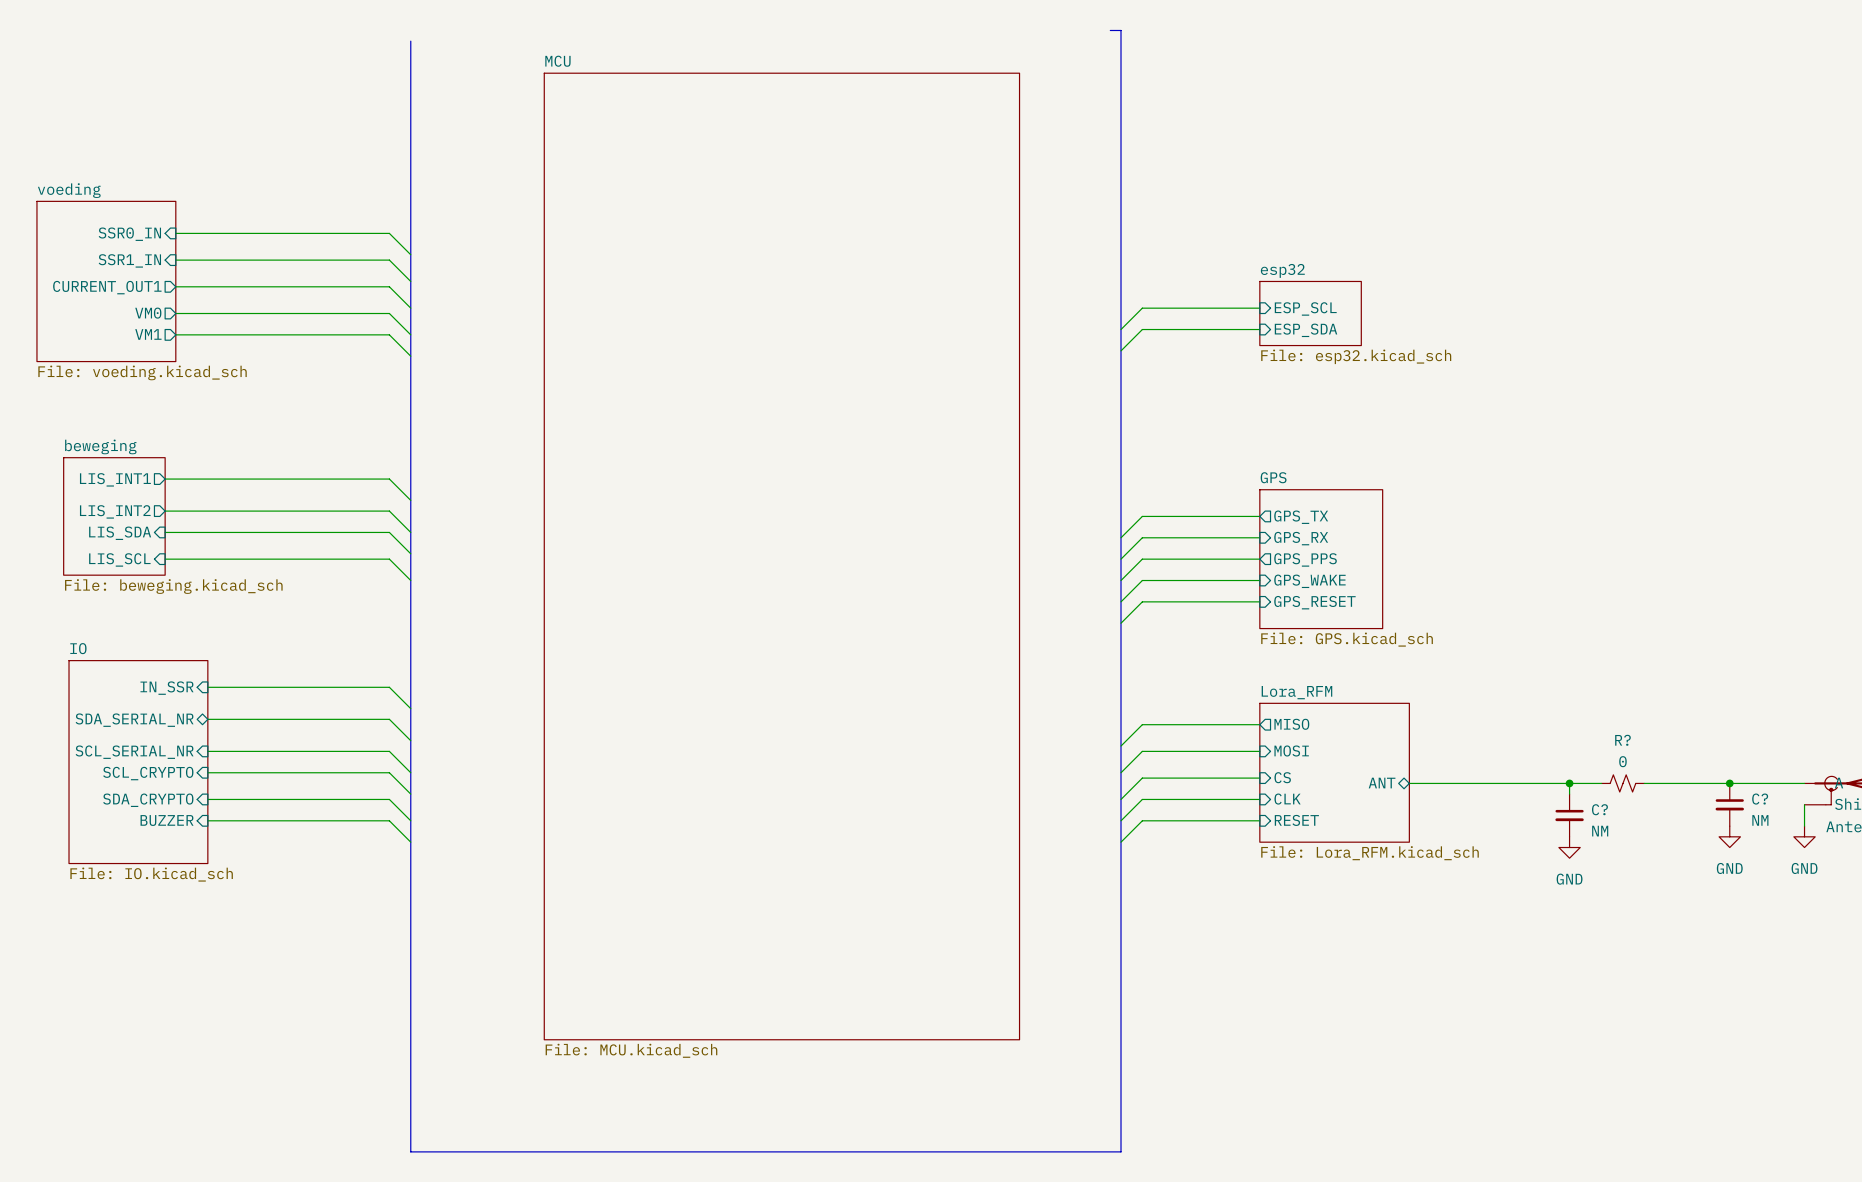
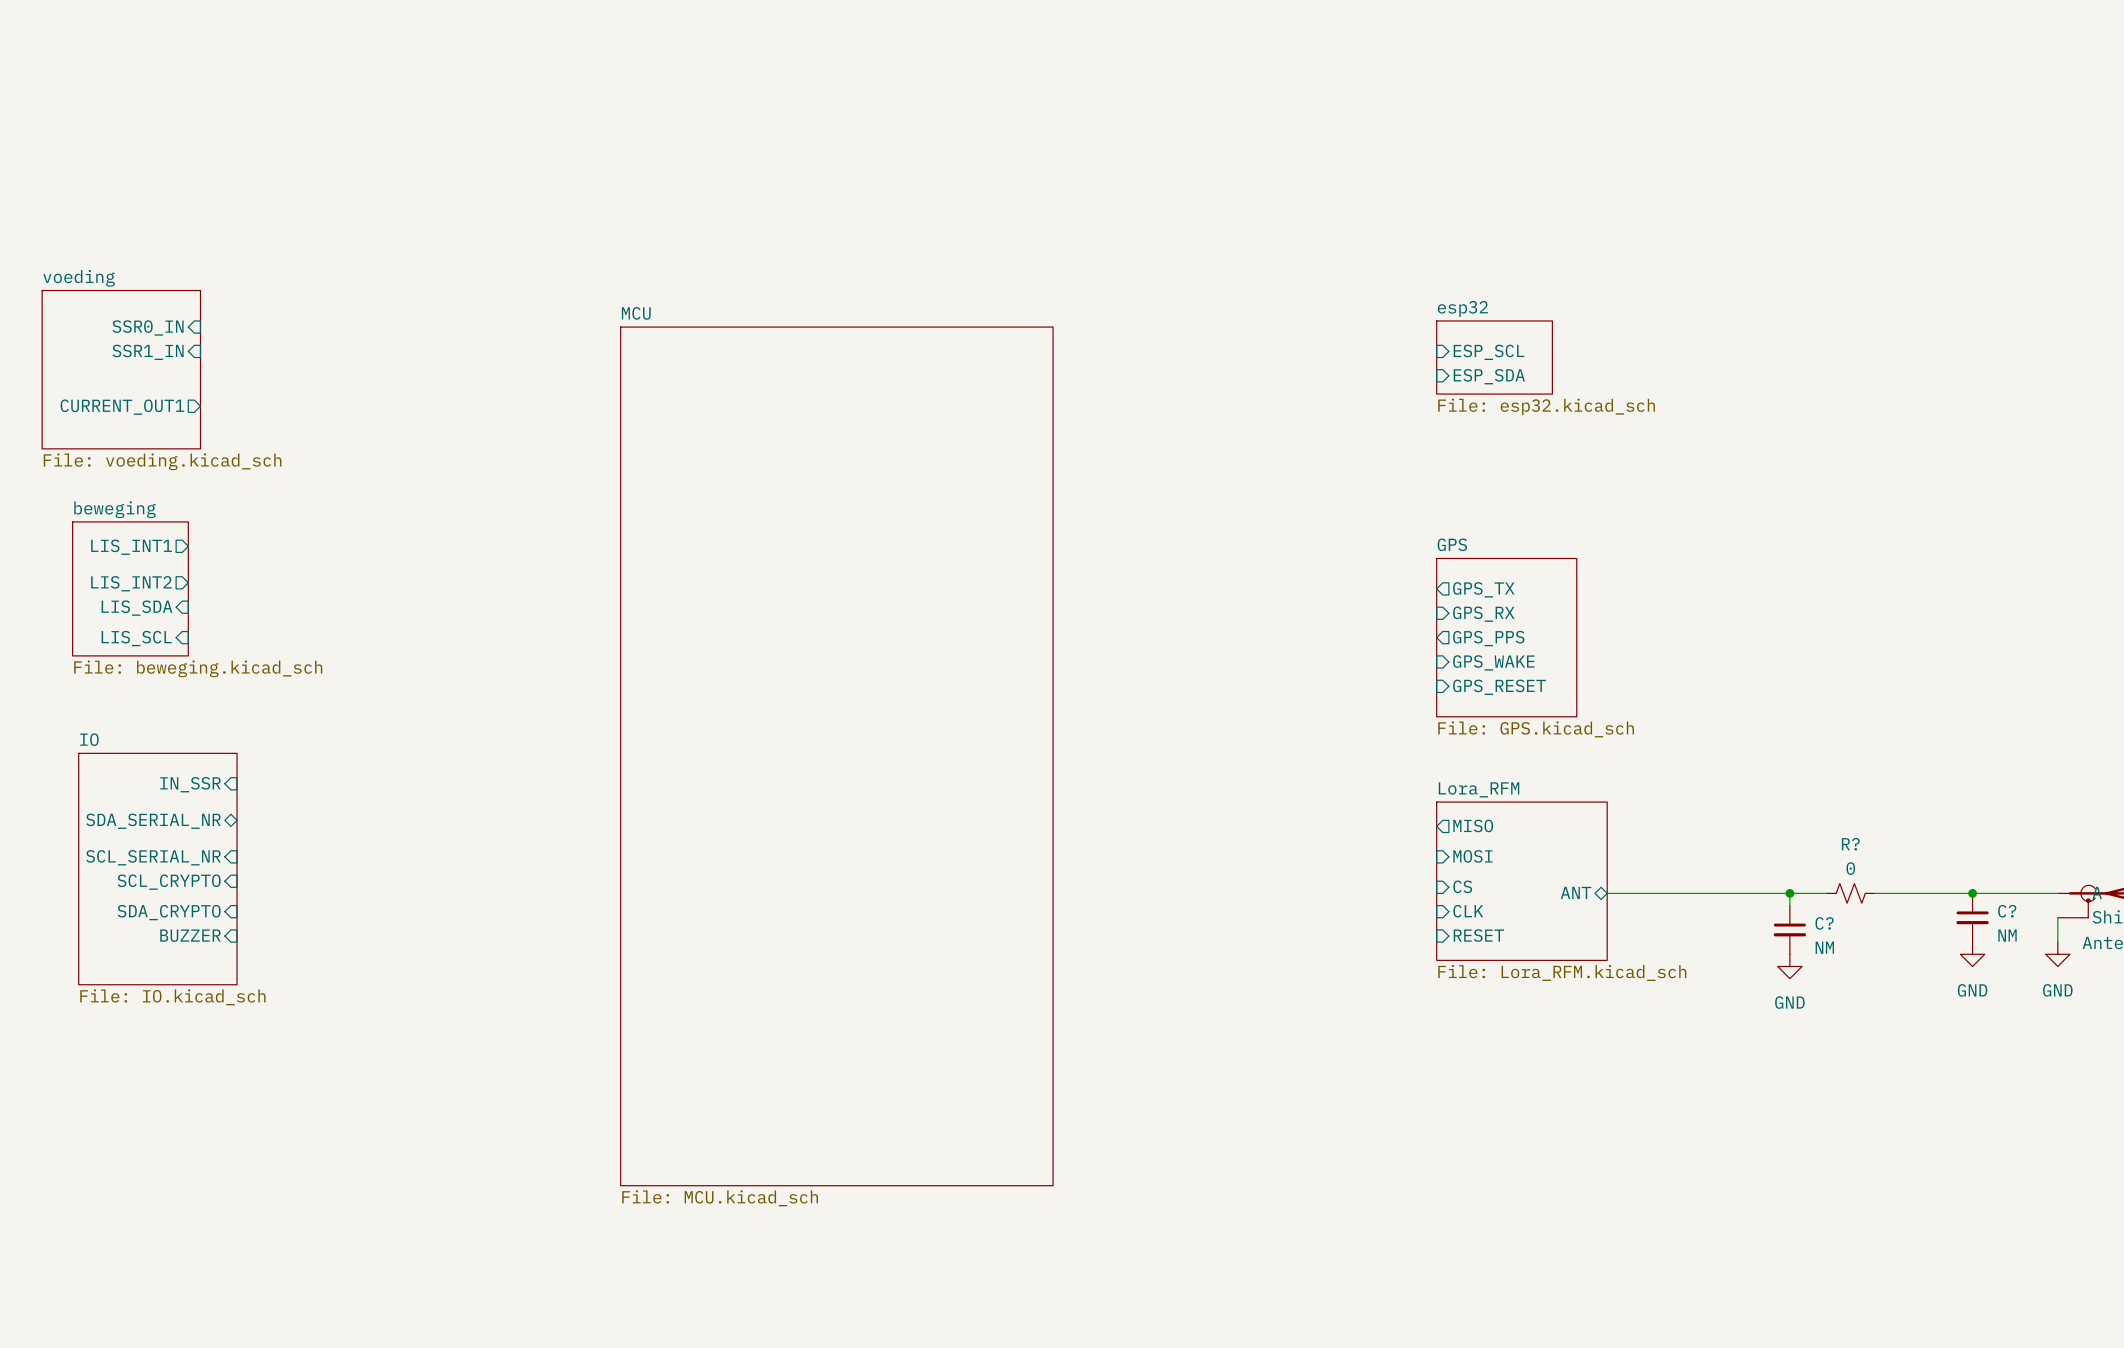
bus: (1110, 30) (1121, 30) (1121, 1151) (410, 1151) (410, 41) -> none
wire: (175, 233) (389, 233) (410, 254) -> none
sheet pin: SSR0_IN (129, 234) -> none
sheet pin position: SSR1_IN (129, 260) -> SSR1_IN (148, 352)
wire: (175, 260) (389, 260) (410, 281) -> none
sheet voeding: File: voeding.kicad_sch (106, 281) -> none
wire: (175, 286) (389, 286) (410, 308) -> none
sheet pin shape: output (107, 287) -> input (148, 327)
sheet pin: CURRENT_OUT1 (107, 287) -> SSR0_IN (148, 327)
wire: (1259, 308) (1142, 308) (1121, 329) -> none
sheet pin: VM0 (148, 313) -> none
wire: (175, 313) (389, 313) (410, 334) -> none
sheet voeding: none -> File: voeding.kicad_sch (121, 369)
wire: (1259, 329) (1142, 329) (1121, 350) -> none
sheet pin: VM1 (148, 334) -> none
wire: (175, 334) (389, 334) (410, 356) -> none
sheet pin: none -> CURRENT_OUT1 (122, 407)
wire: (165, 479) (389, 479) (410, 500) -> none
wire: (165, 511) (389, 511) (410, 532) -> none
wire: (1142, 516) (1121, 537) -> none
wire: (1142, 516) (1259, 516) -> none
wire: (165, 532) (389, 532) (410, 553) -> none
wire: (1259, 537) (1142, 537) (1121, 559) -> none
sheet MCU: File: MCU.kicad_sch (781, 556) -> none
wire: (165, 559) (389, 559) (410, 580) -> none
wire: (1259, 559) (1142, 559) (1121, 580) -> none
wire: (1142, 580) (1121, 601) -> none
wire: (1142, 580) (1259, 580) -> none
wire: (1259, 601) (1142, 601) (1121, 623) -> none
sheet MCU: none -> File: MCU.kicad_sch (836, 756)
wire: (207, 687) (389, 687) (410, 708) -> none
wire: (207, 719) (389, 719) (410, 740) -> none
wire: (1259, 724) (1142, 724) (1121, 746) -> none
wire: (207, 751) (389, 751) (410, 772) -> none
wire: (1259, 751) (1142, 751) (1121, 772) -> none
wire: (207, 772) (389, 772) (410, 794) -> none
wire: (1259, 778) (1142, 778) (1121, 799) -> none
wire: (207, 799) (389, 799) (410, 820) -> none
wire: (1259, 799) (1142, 799) (1121, 820) -> none
wire: (207, 820) (389, 820) (410, 842) -> none
wire: (1259, 820) (1142, 820) (1121, 842) -> none

